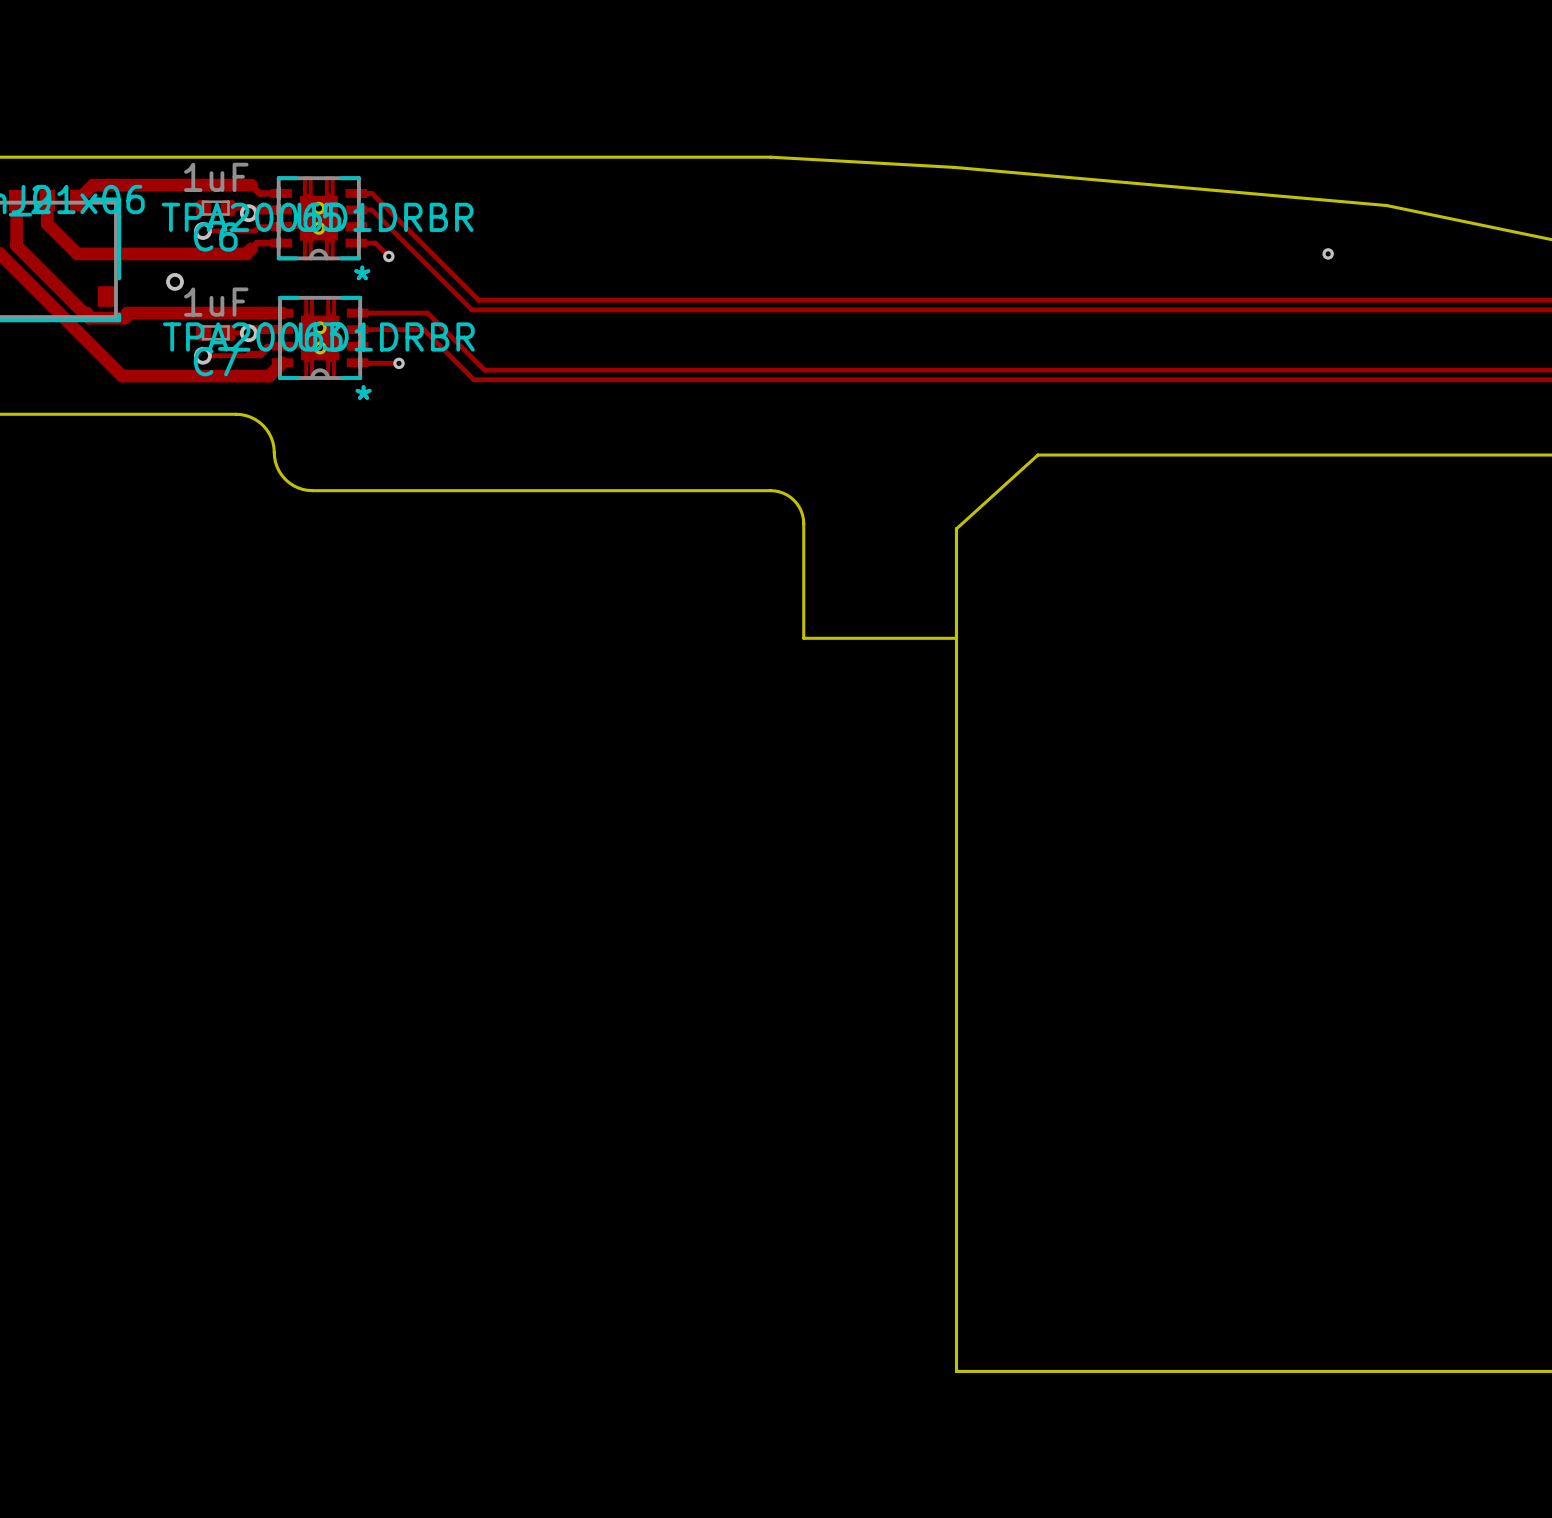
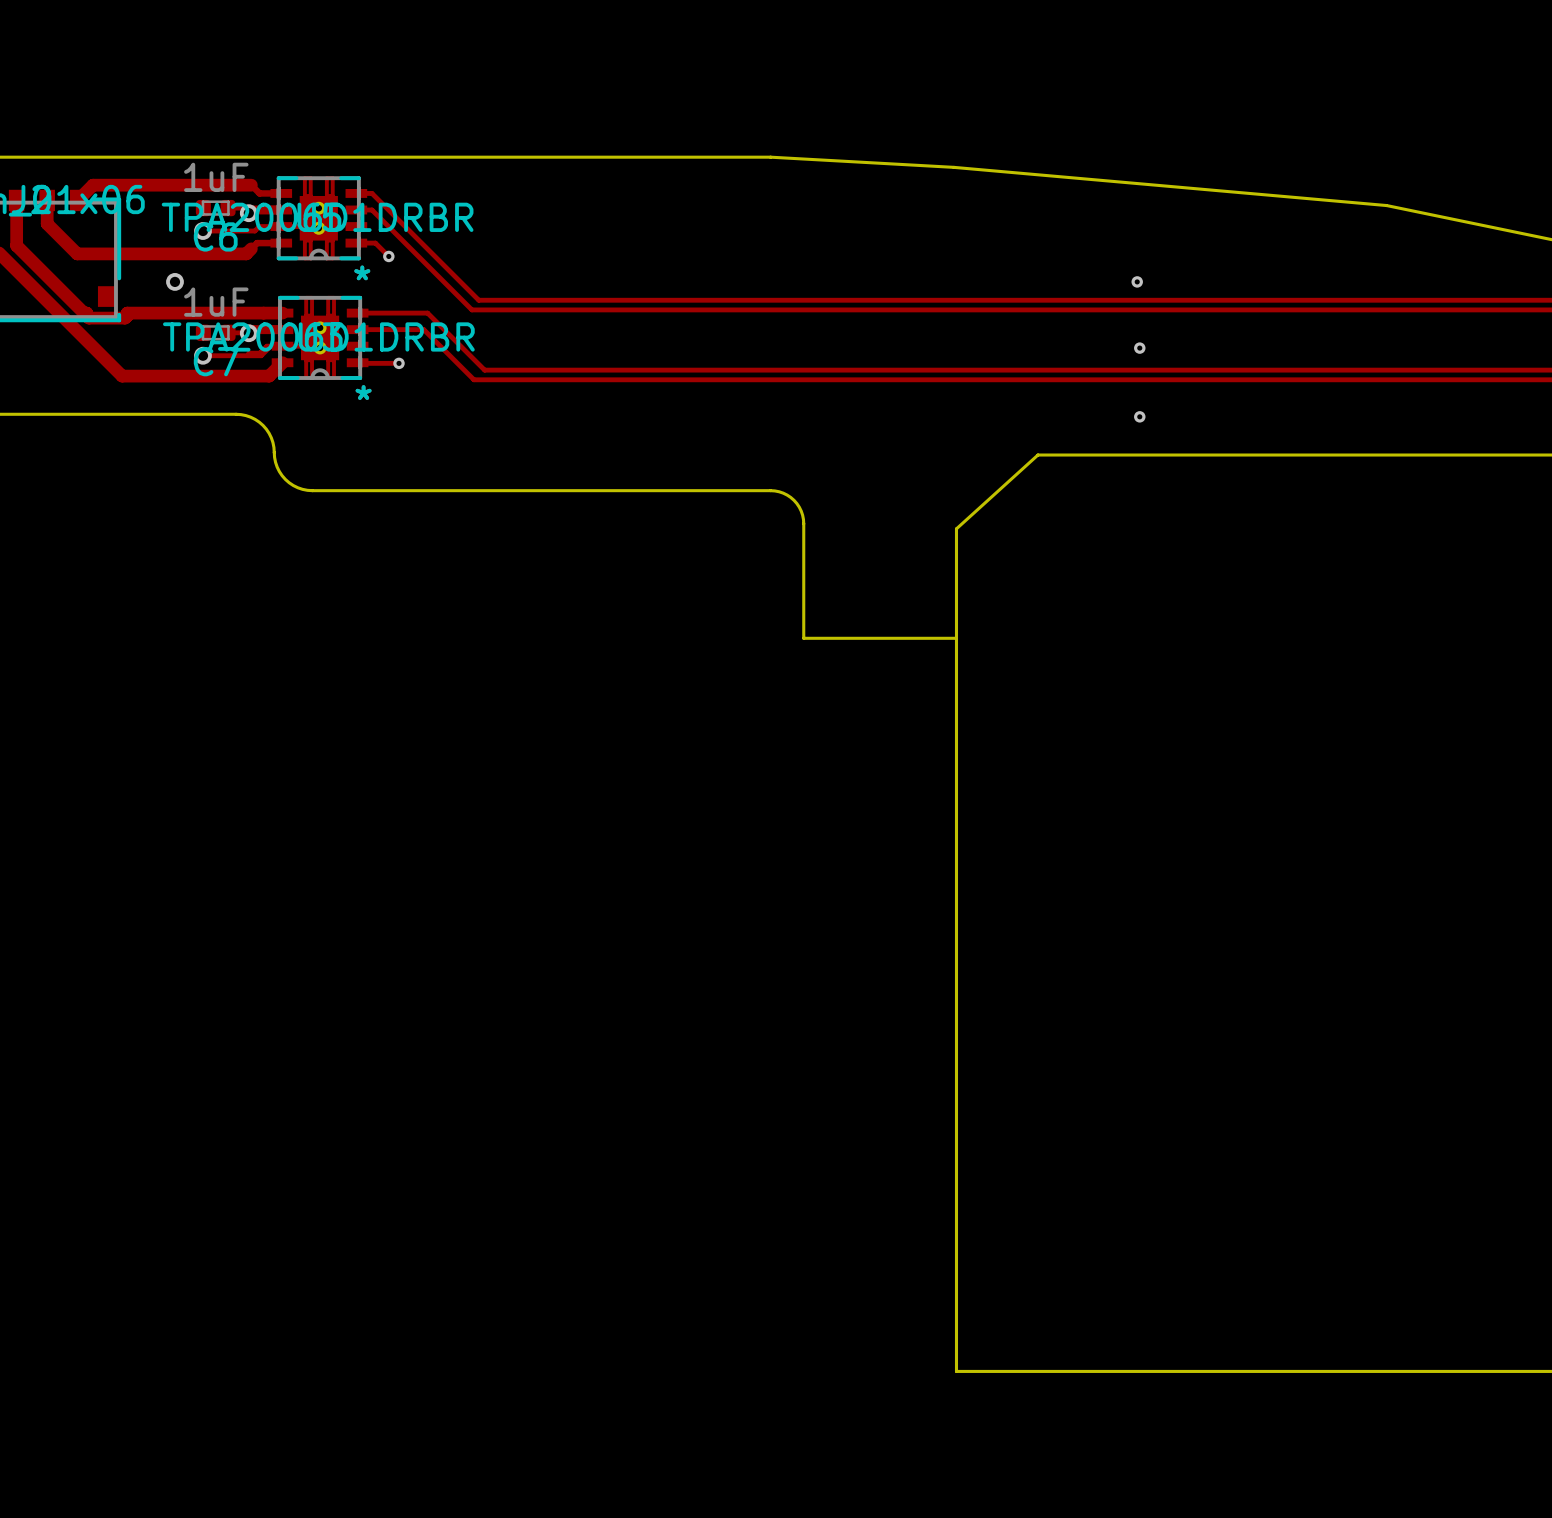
via: (1328, 253) -> none
via: none -> (1137, 281)
via: none -> (1139, 348)
via: none -> (1139, 416)

